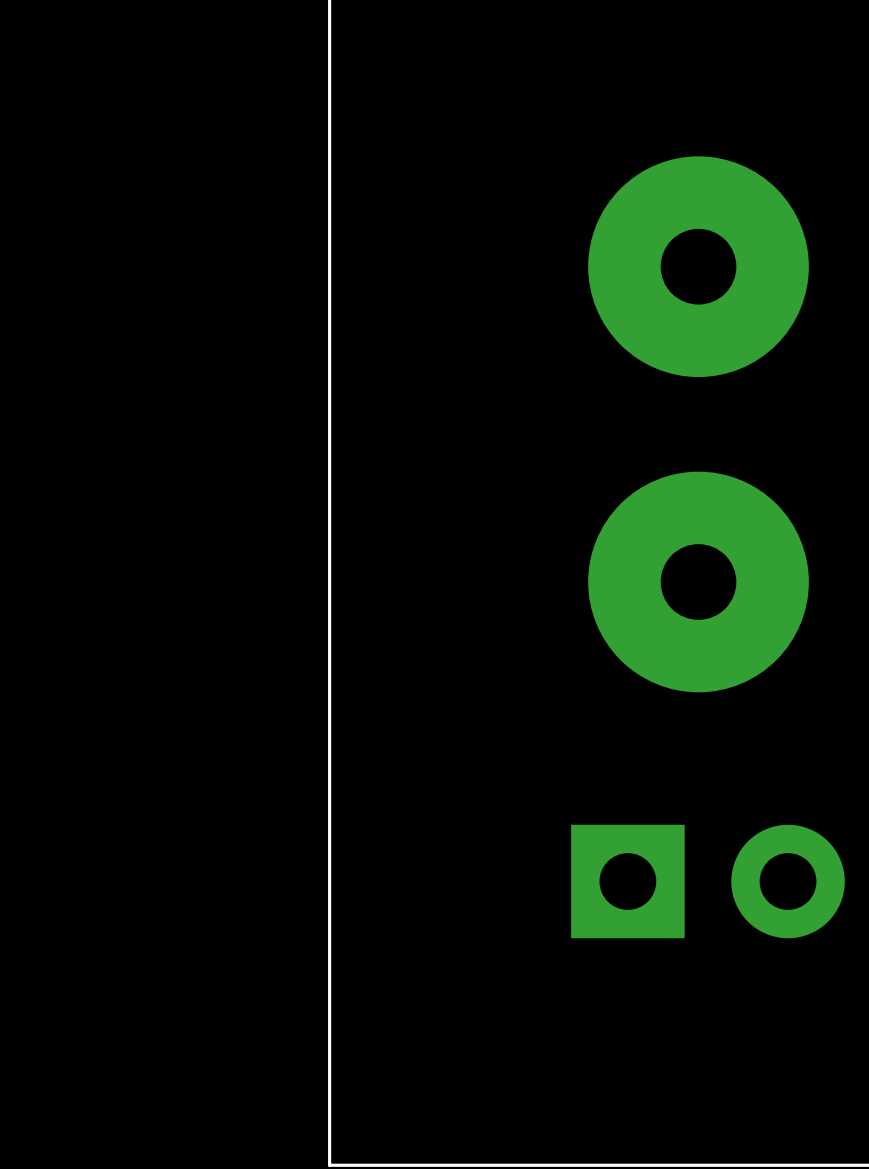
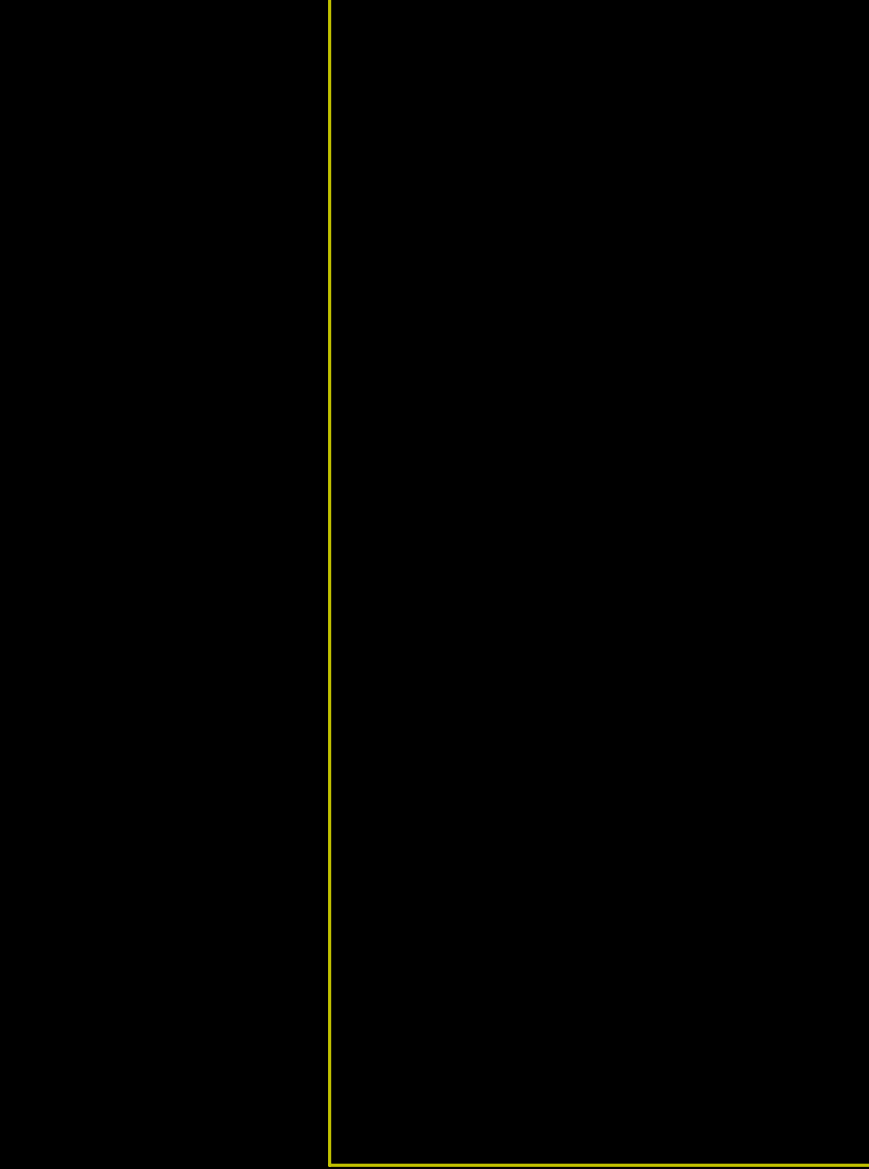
part: (698, 424) -> none
part: (707, 881) -> none

